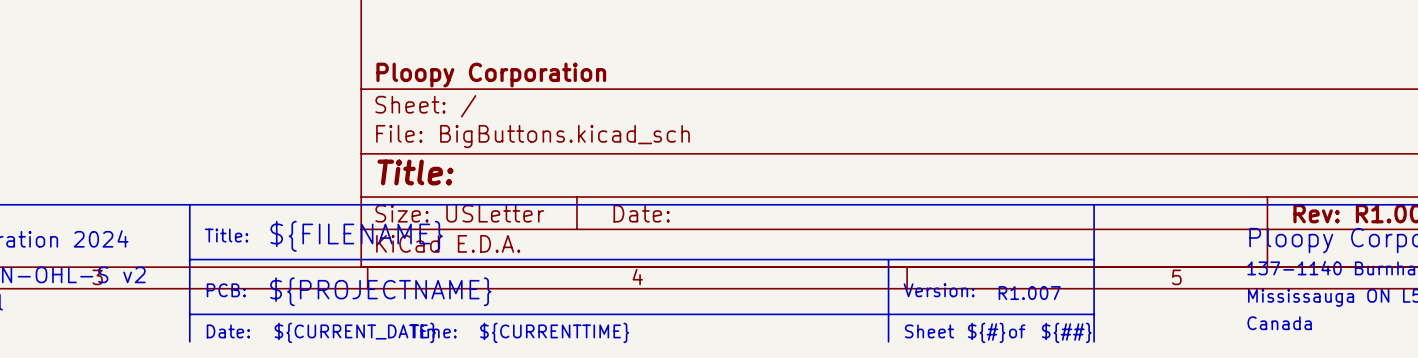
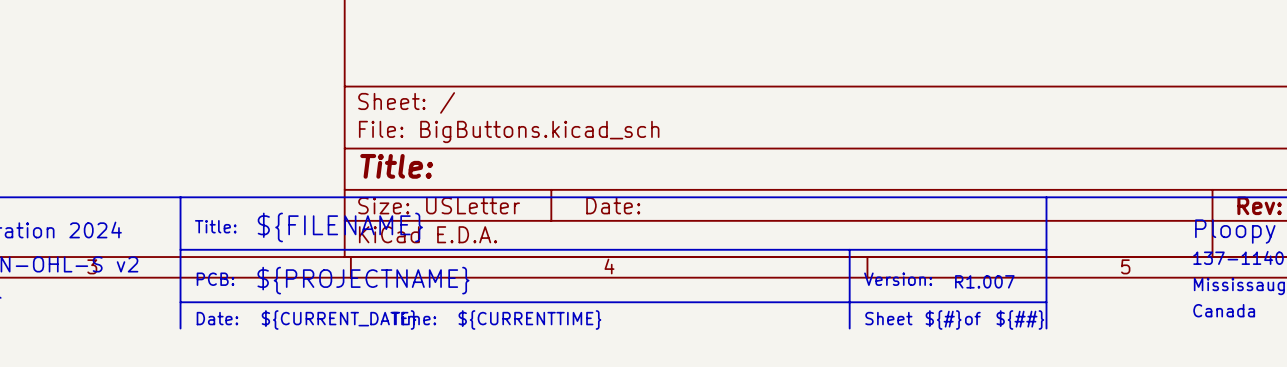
title block: Ploopy Corporation (491, 75) -> none

